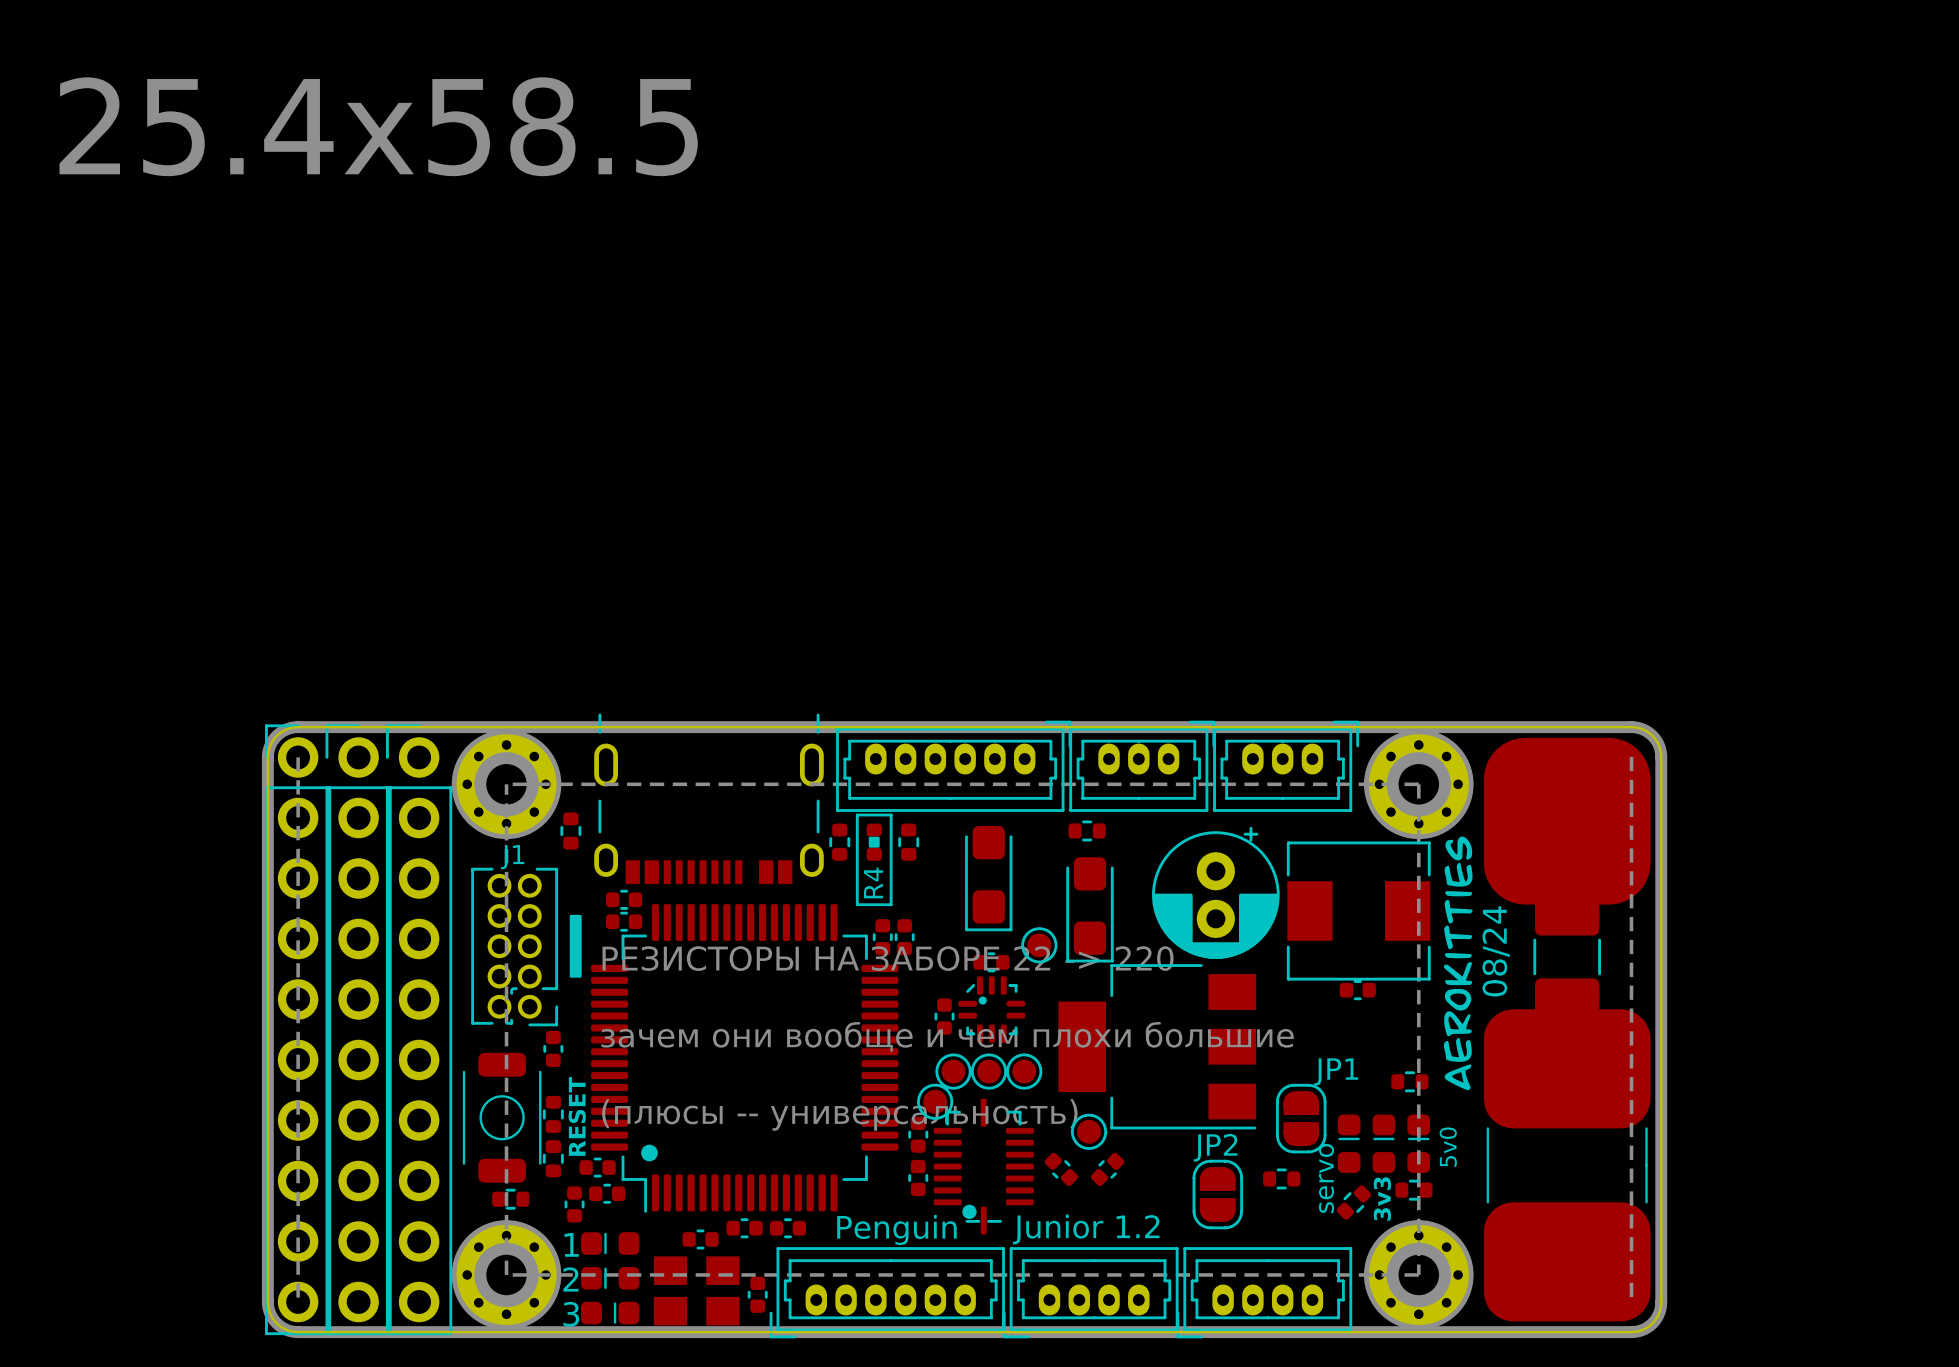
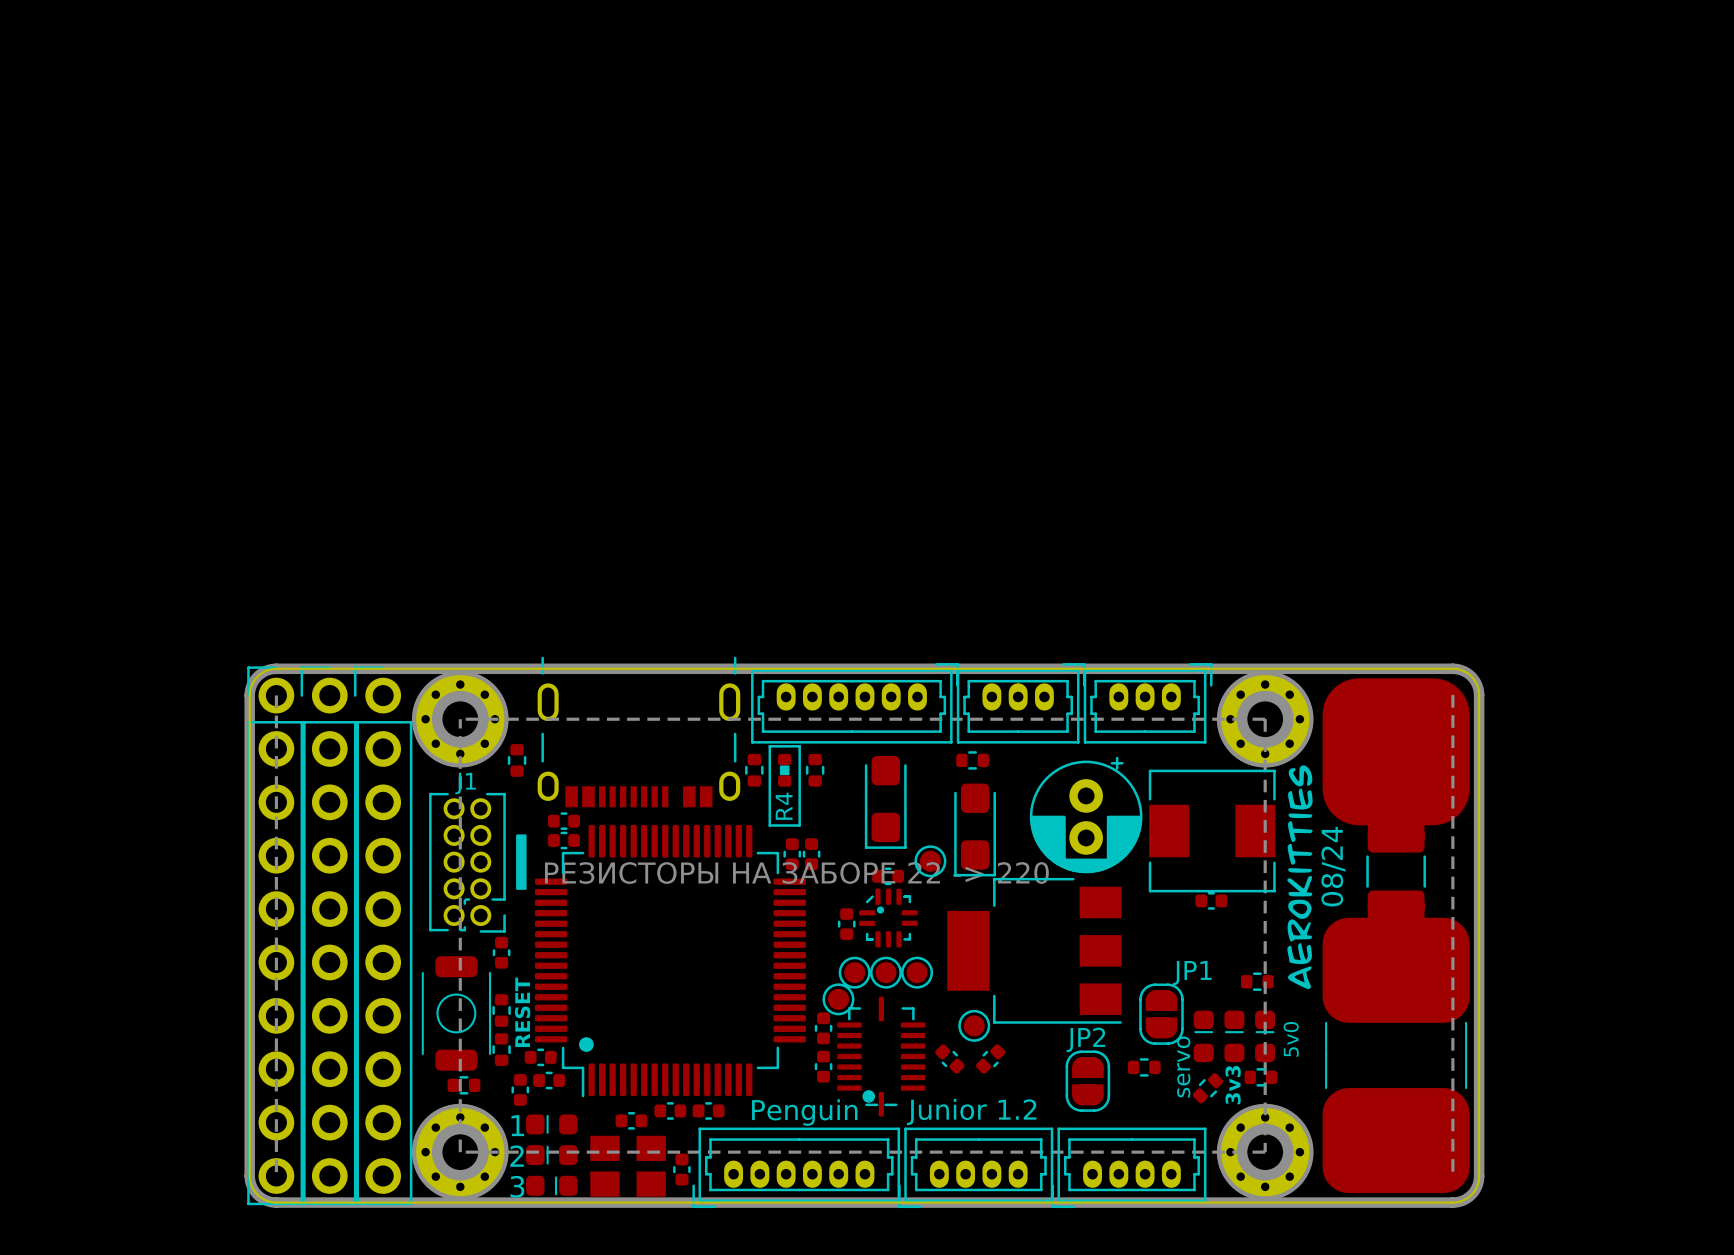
text: 25.4x58.5 (378, 126) -> none
text: зачем они вообще и чем плохи большие (947, 1036) -> none
text: (плюсы -- универсальность) (839, 1114) -> none

